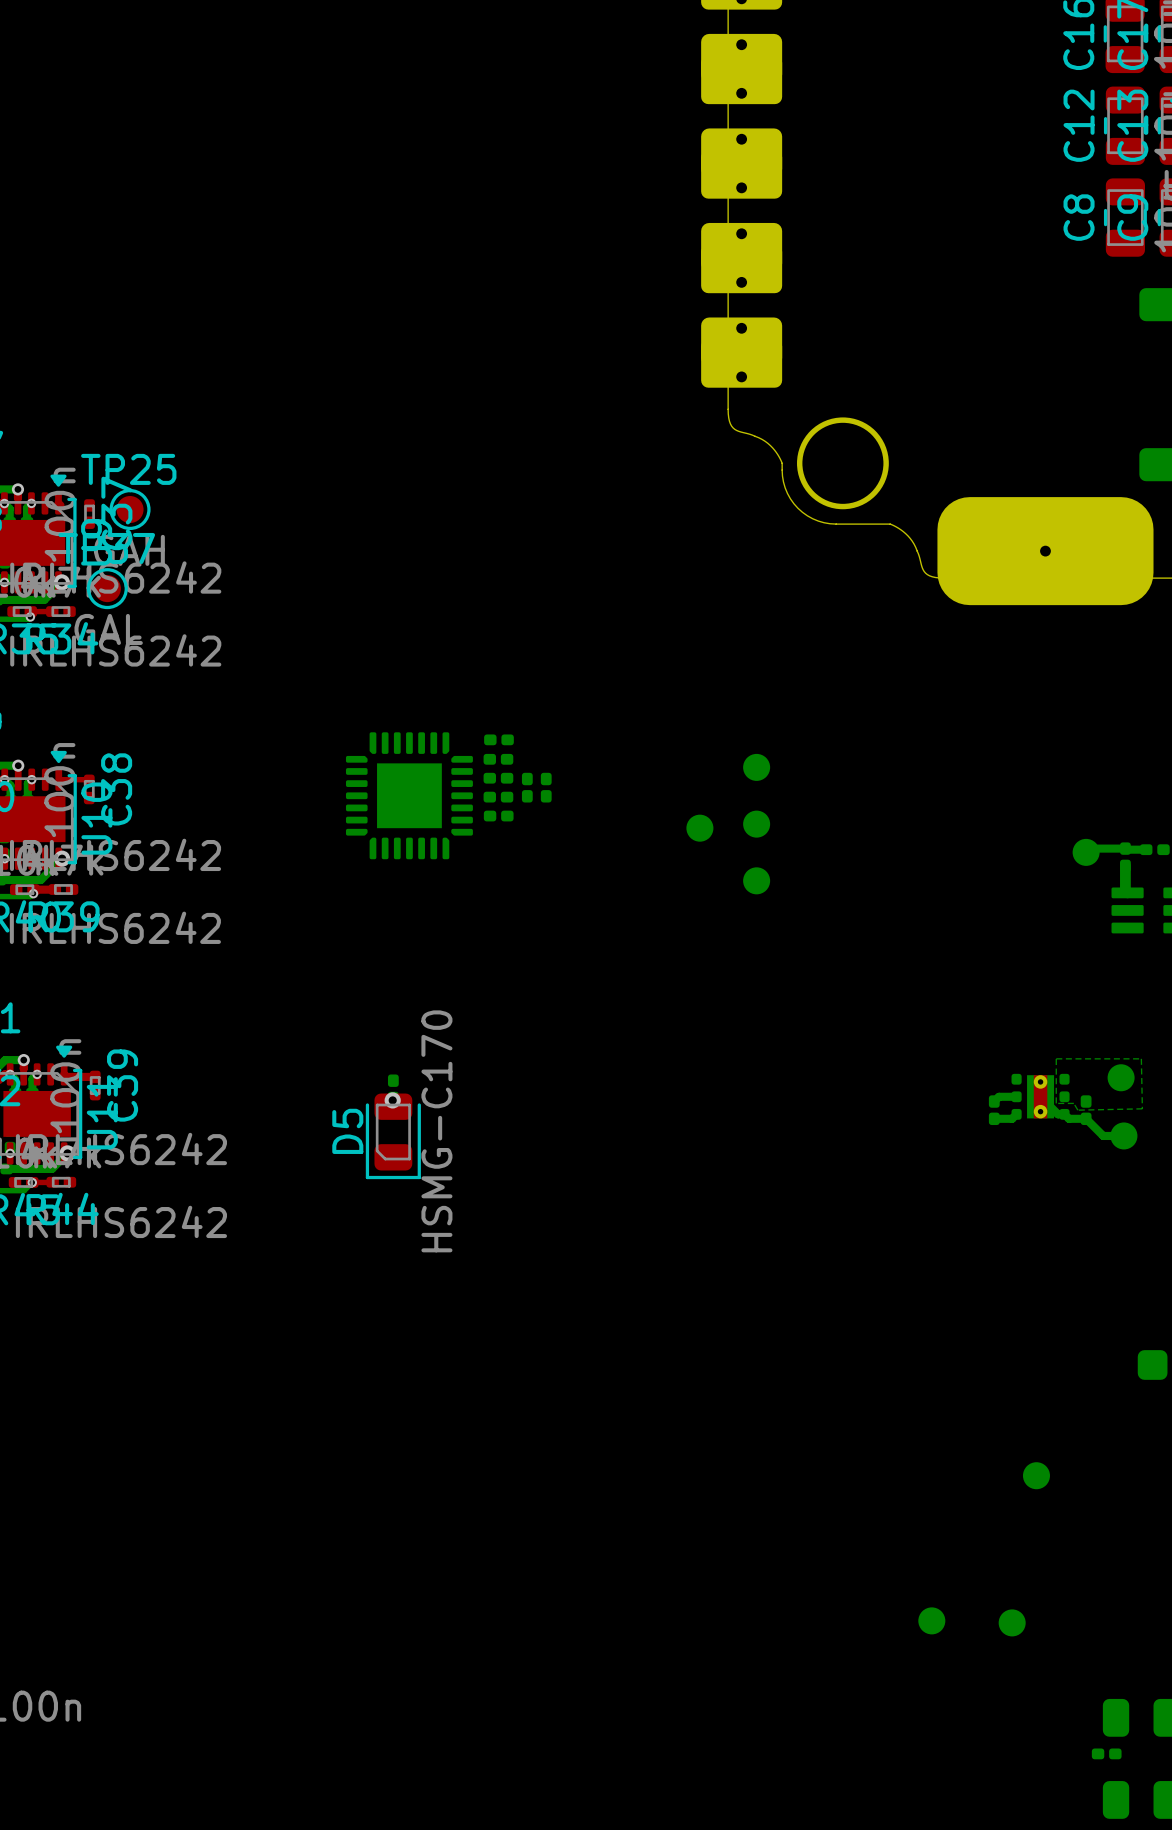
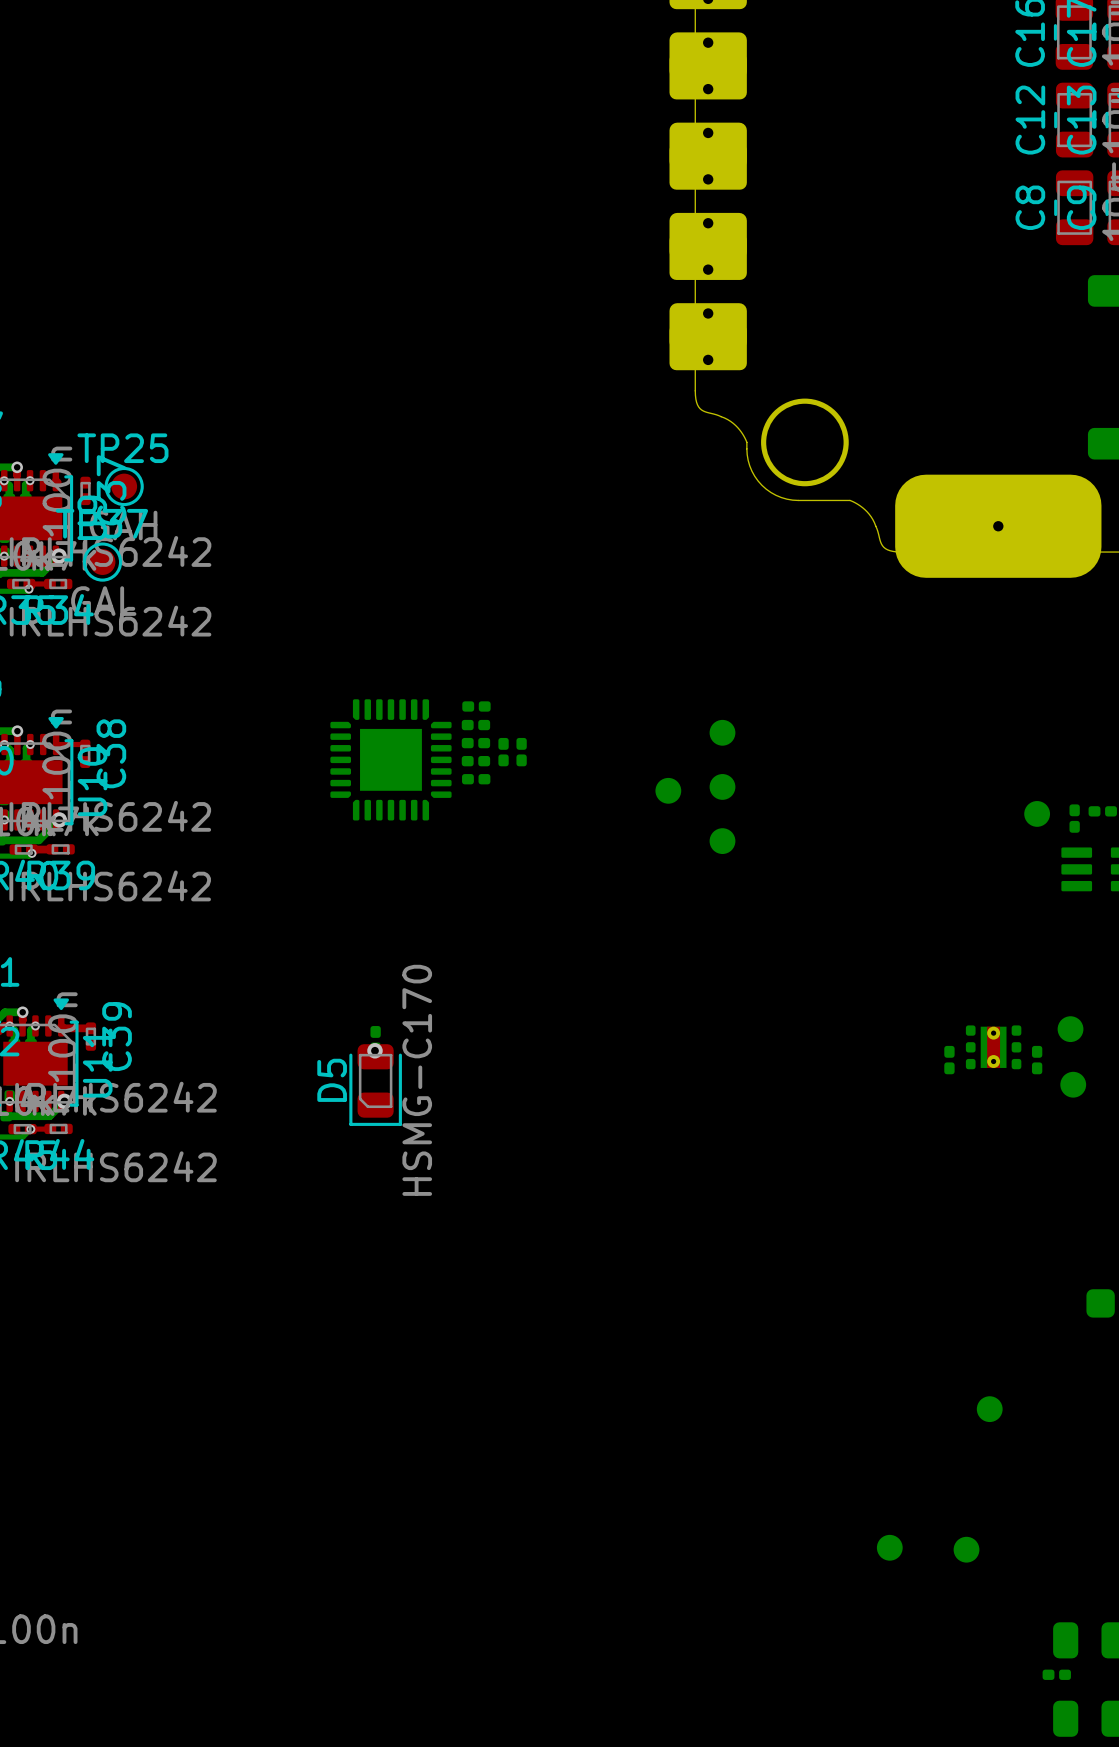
bottom track: (1146, 849) (1089, 848) (1086, 852) -> none
bottom track: (1125, 865) (1125, 890) (1127, 892) -> none
bottom zone outline: (1056, 1058) (1141, 1058) (1142, 1108) (1077, 1110) (1073, 1103) (1056, 1103) (1056, 1058) -> none
bottom track: (1016, 1096) (999, 1096) (994, 1101) -> none
bottom track: (1040, 1096) (1058, 1114) (1064, 1114) (1068, 1118) (1086, 1118) (1103, 1135) (1123, 1135) -> none
bottom track: (1016, 1114) (1012, 1118) (994, 1118) -> none

